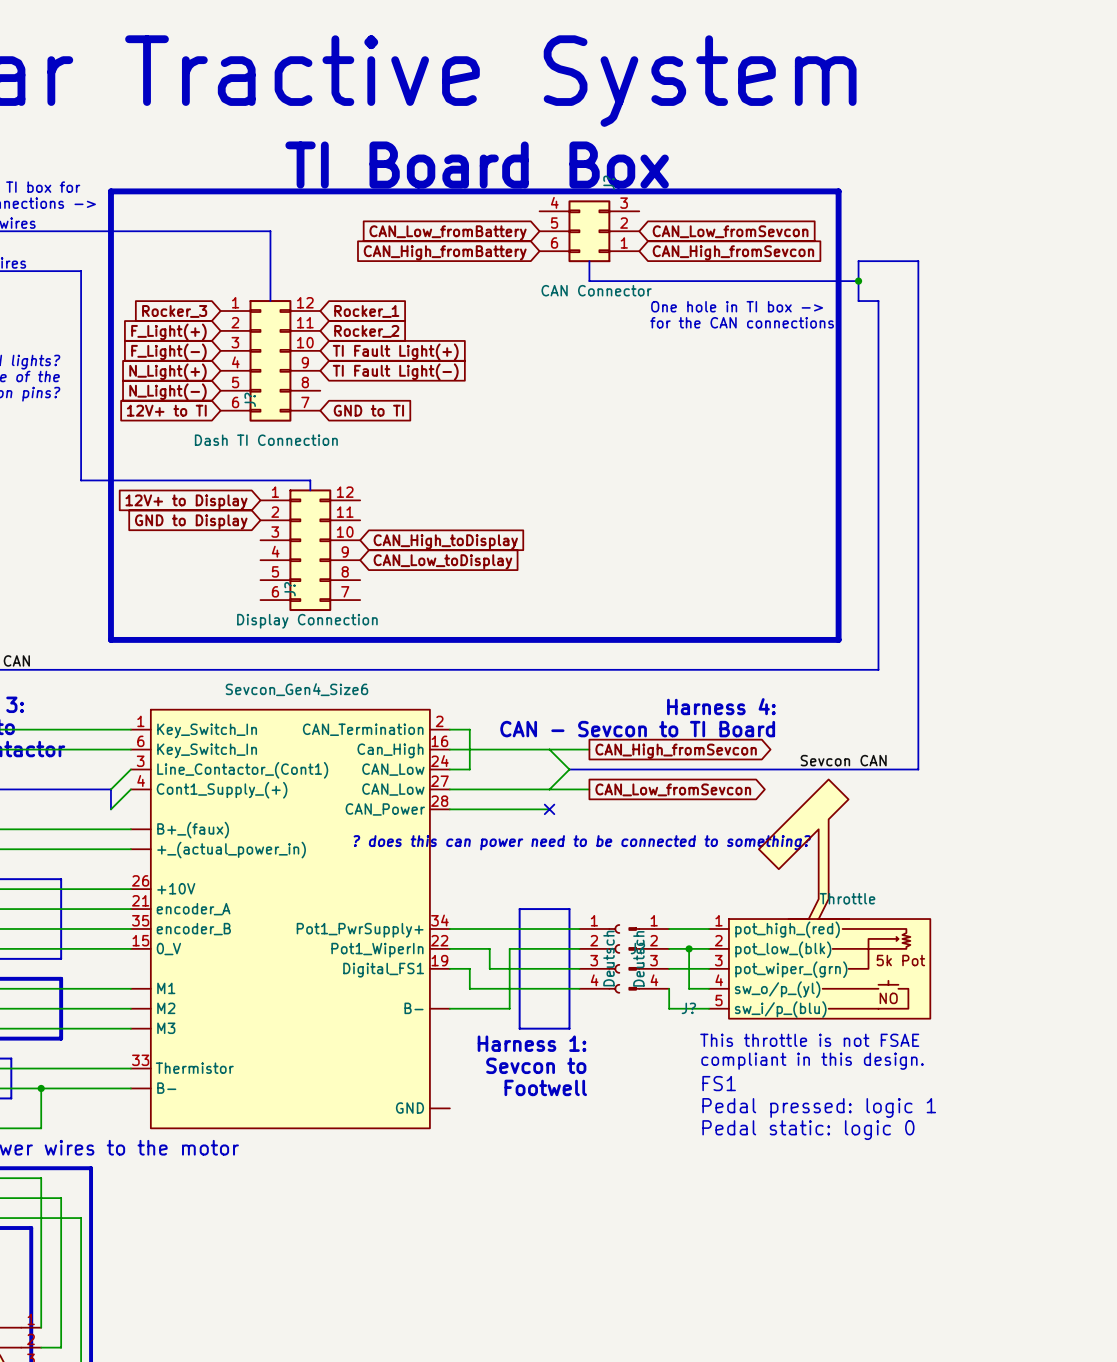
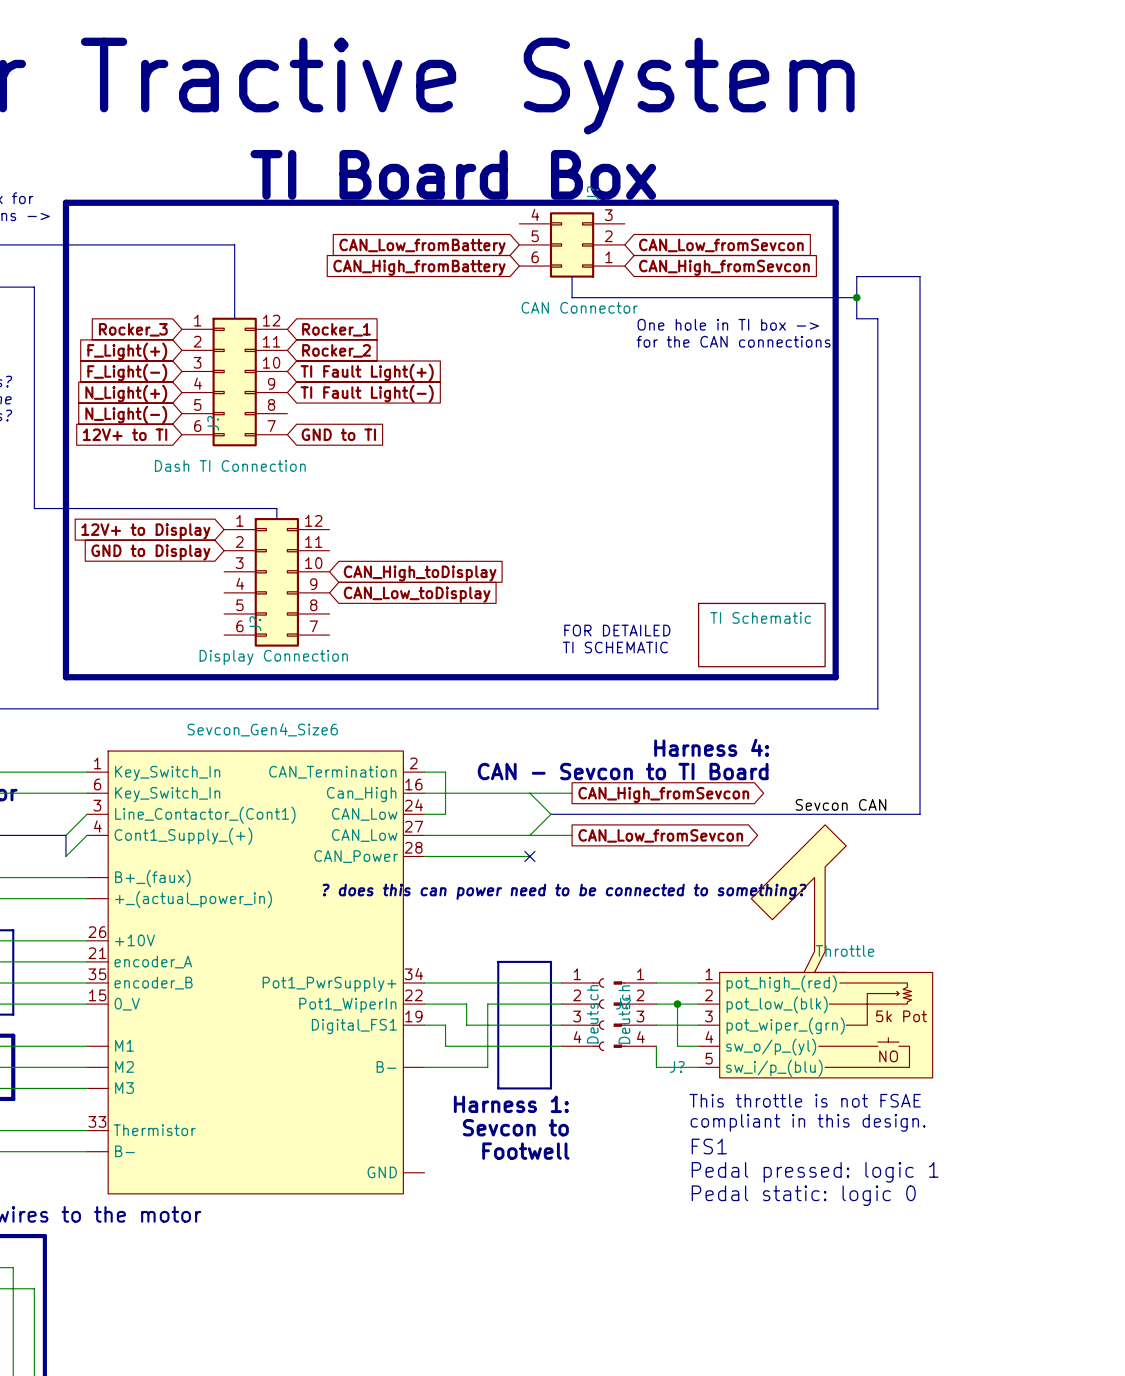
text: none -> FOR DETAILED (617, 630)
sheet TI Schematic: none -> (761, 635)
text: none -> TI SCHEMATIC (615, 647)

